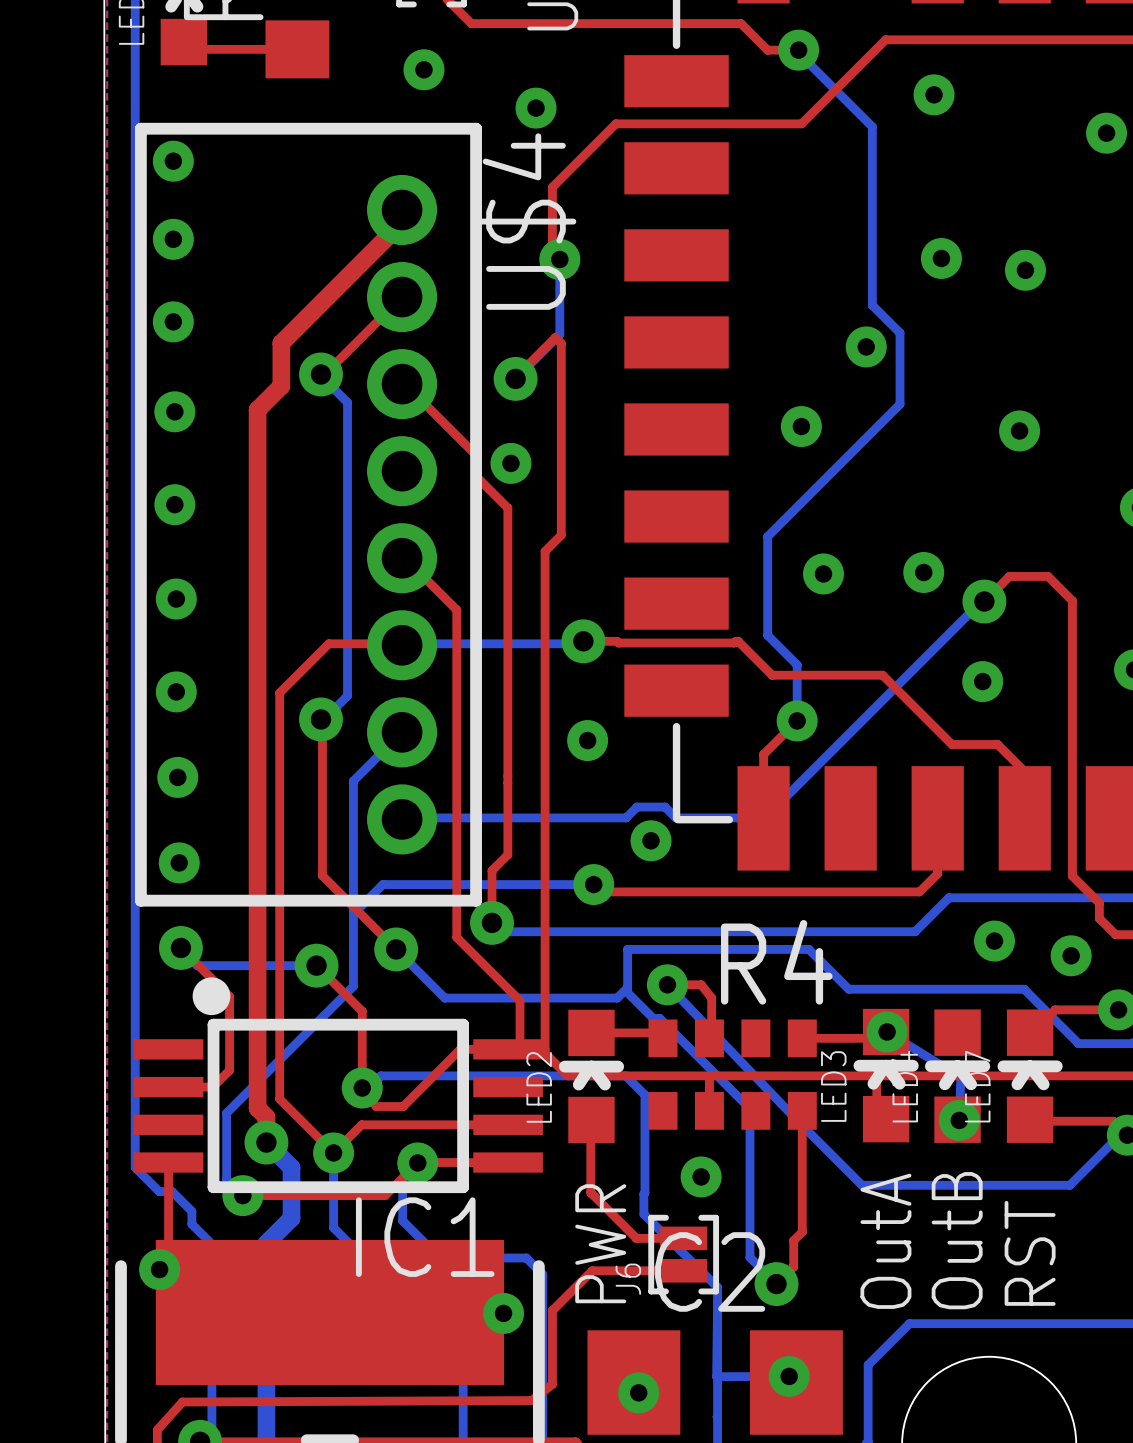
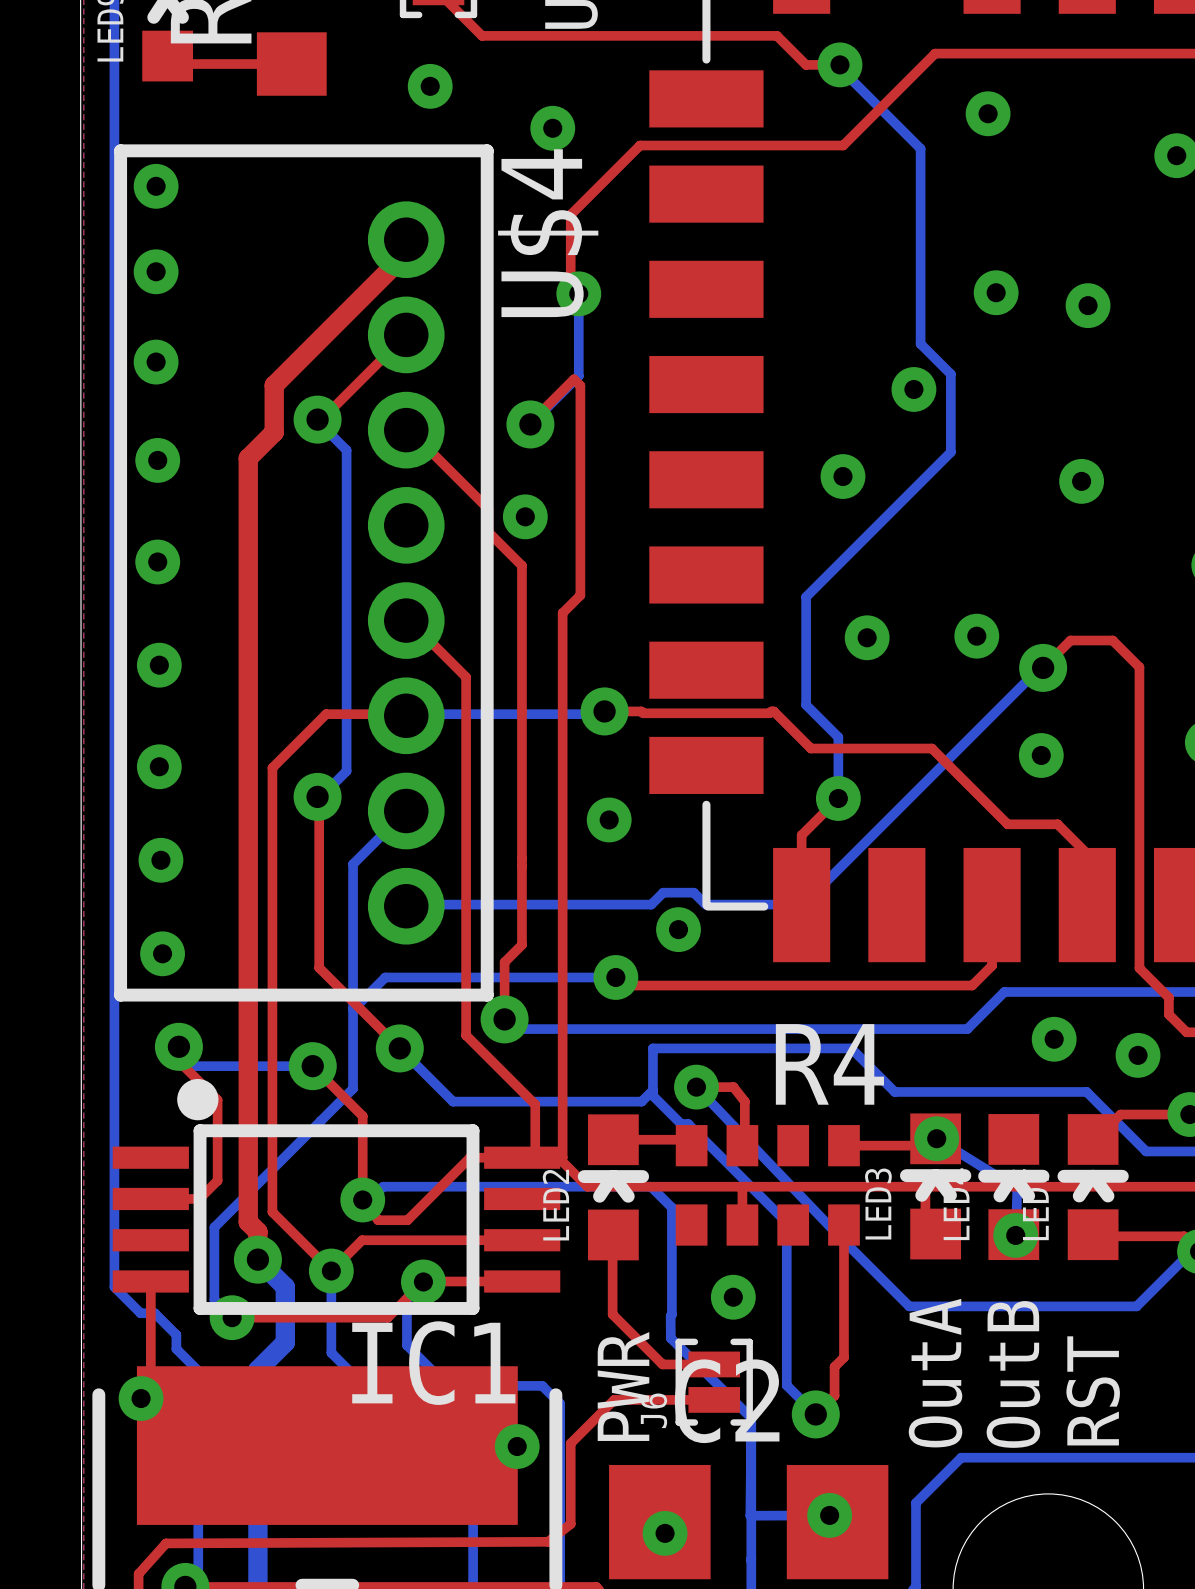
via position: (180, 947) -> (178, 1046)

